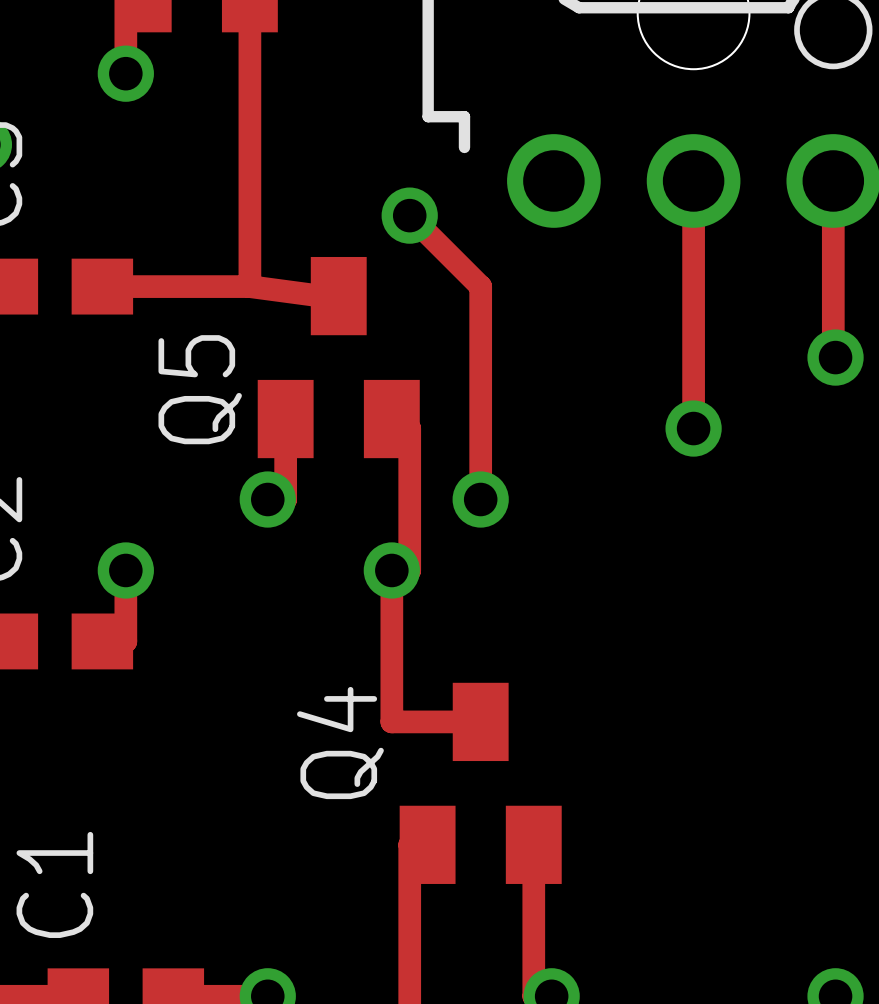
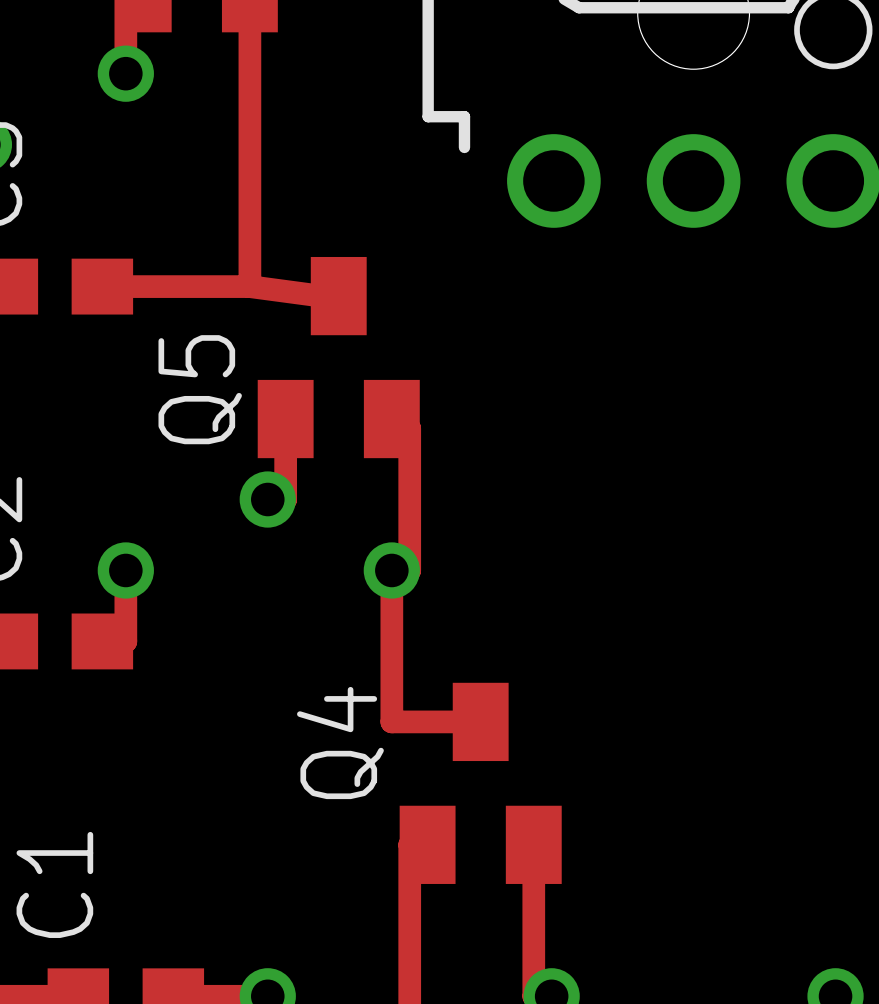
track: (693, 180) (693, 428) -> none
track: (833, 180) (833, 357) (835, 357) -> none
track: (409, 215) (480, 286) (480, 499) -> none
via: (409, 215) -> none
via: (835, 357) -> none
via: (693, 428) -> none
via: (480, 499) -> none

